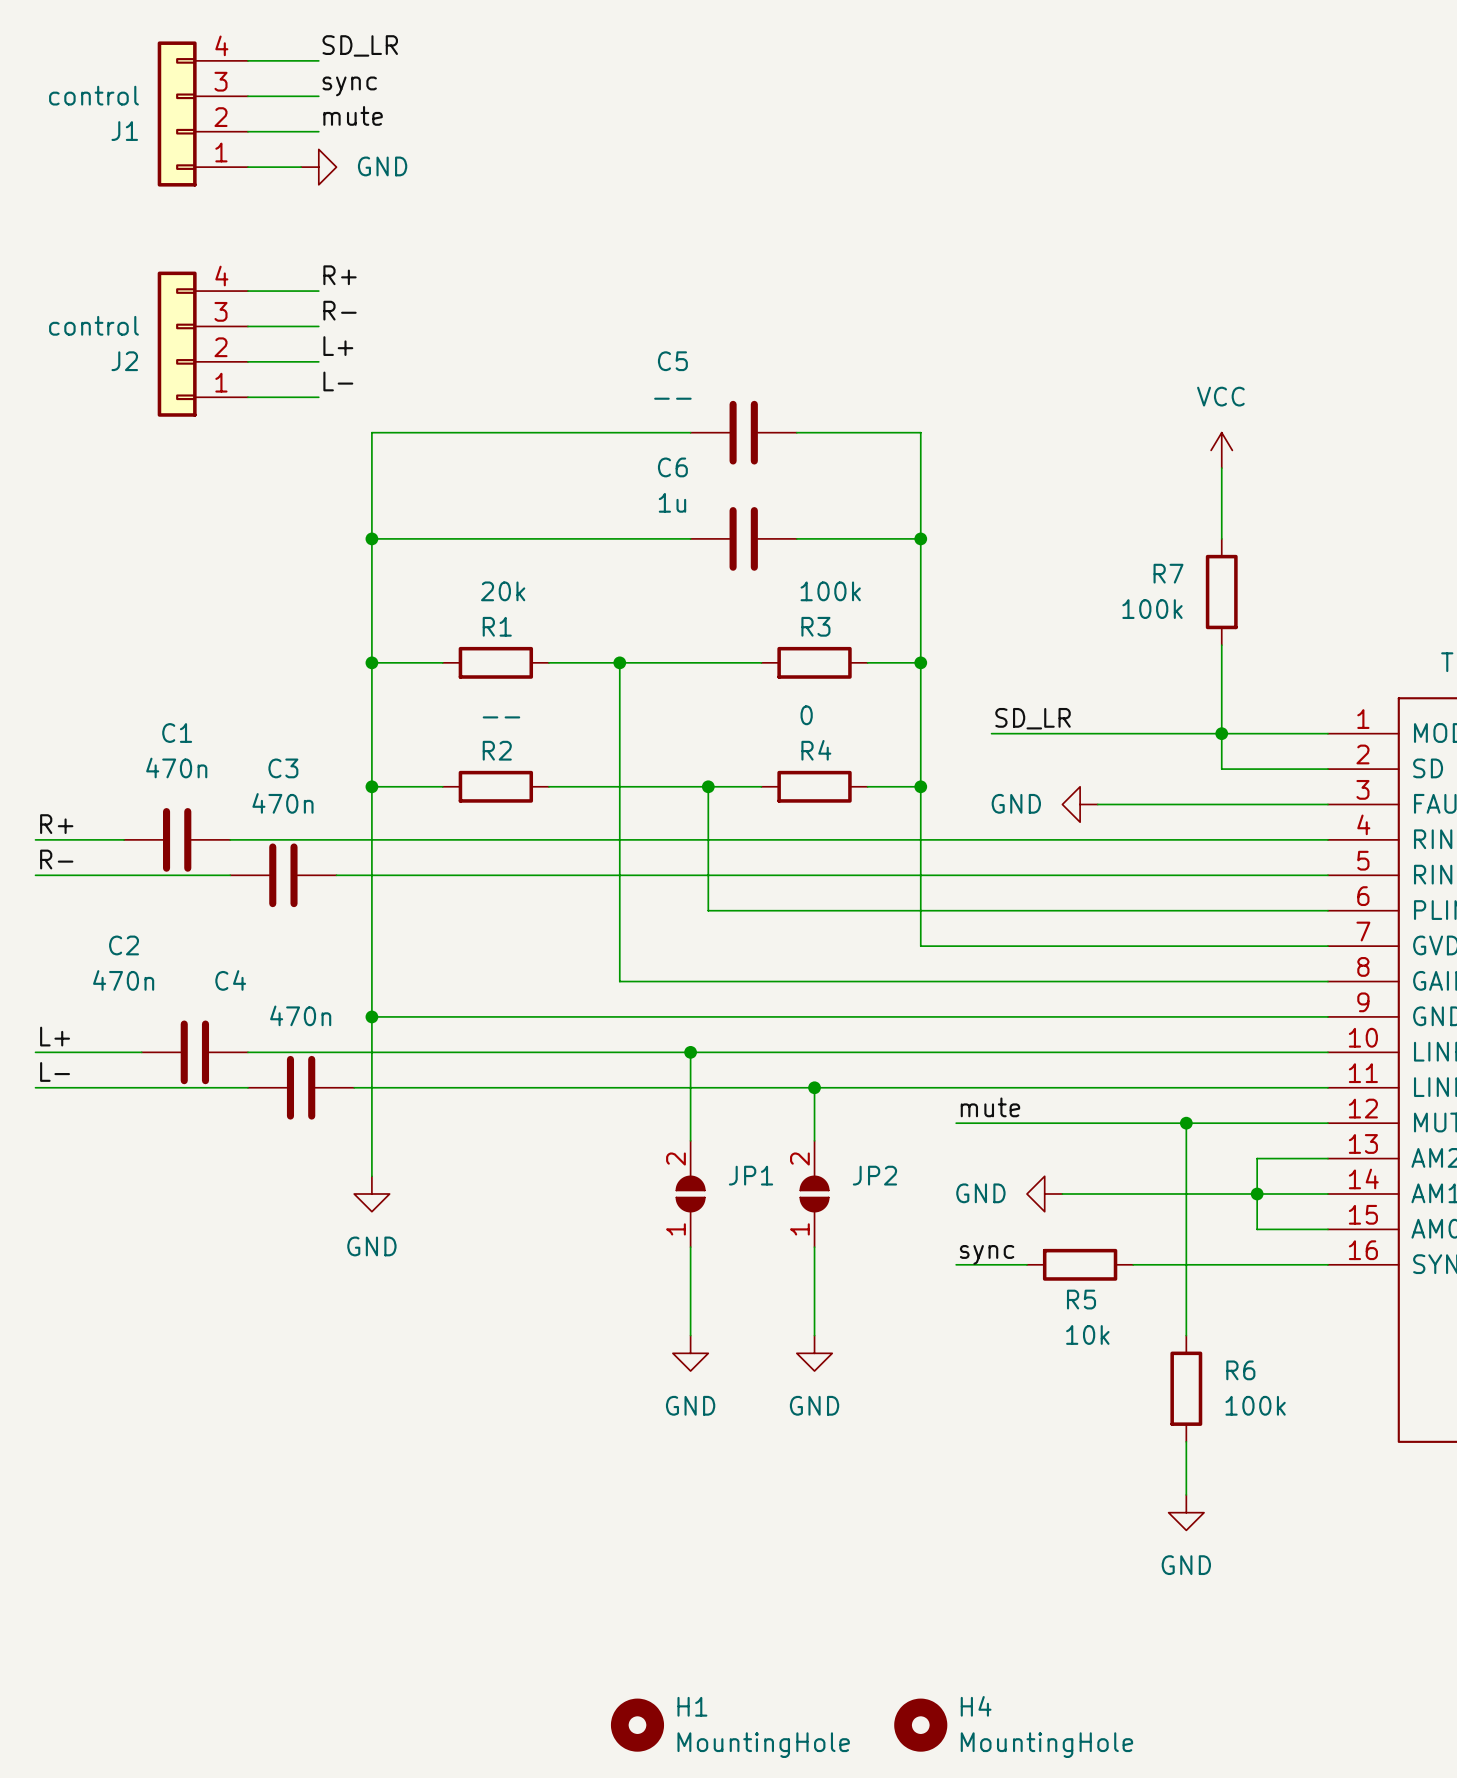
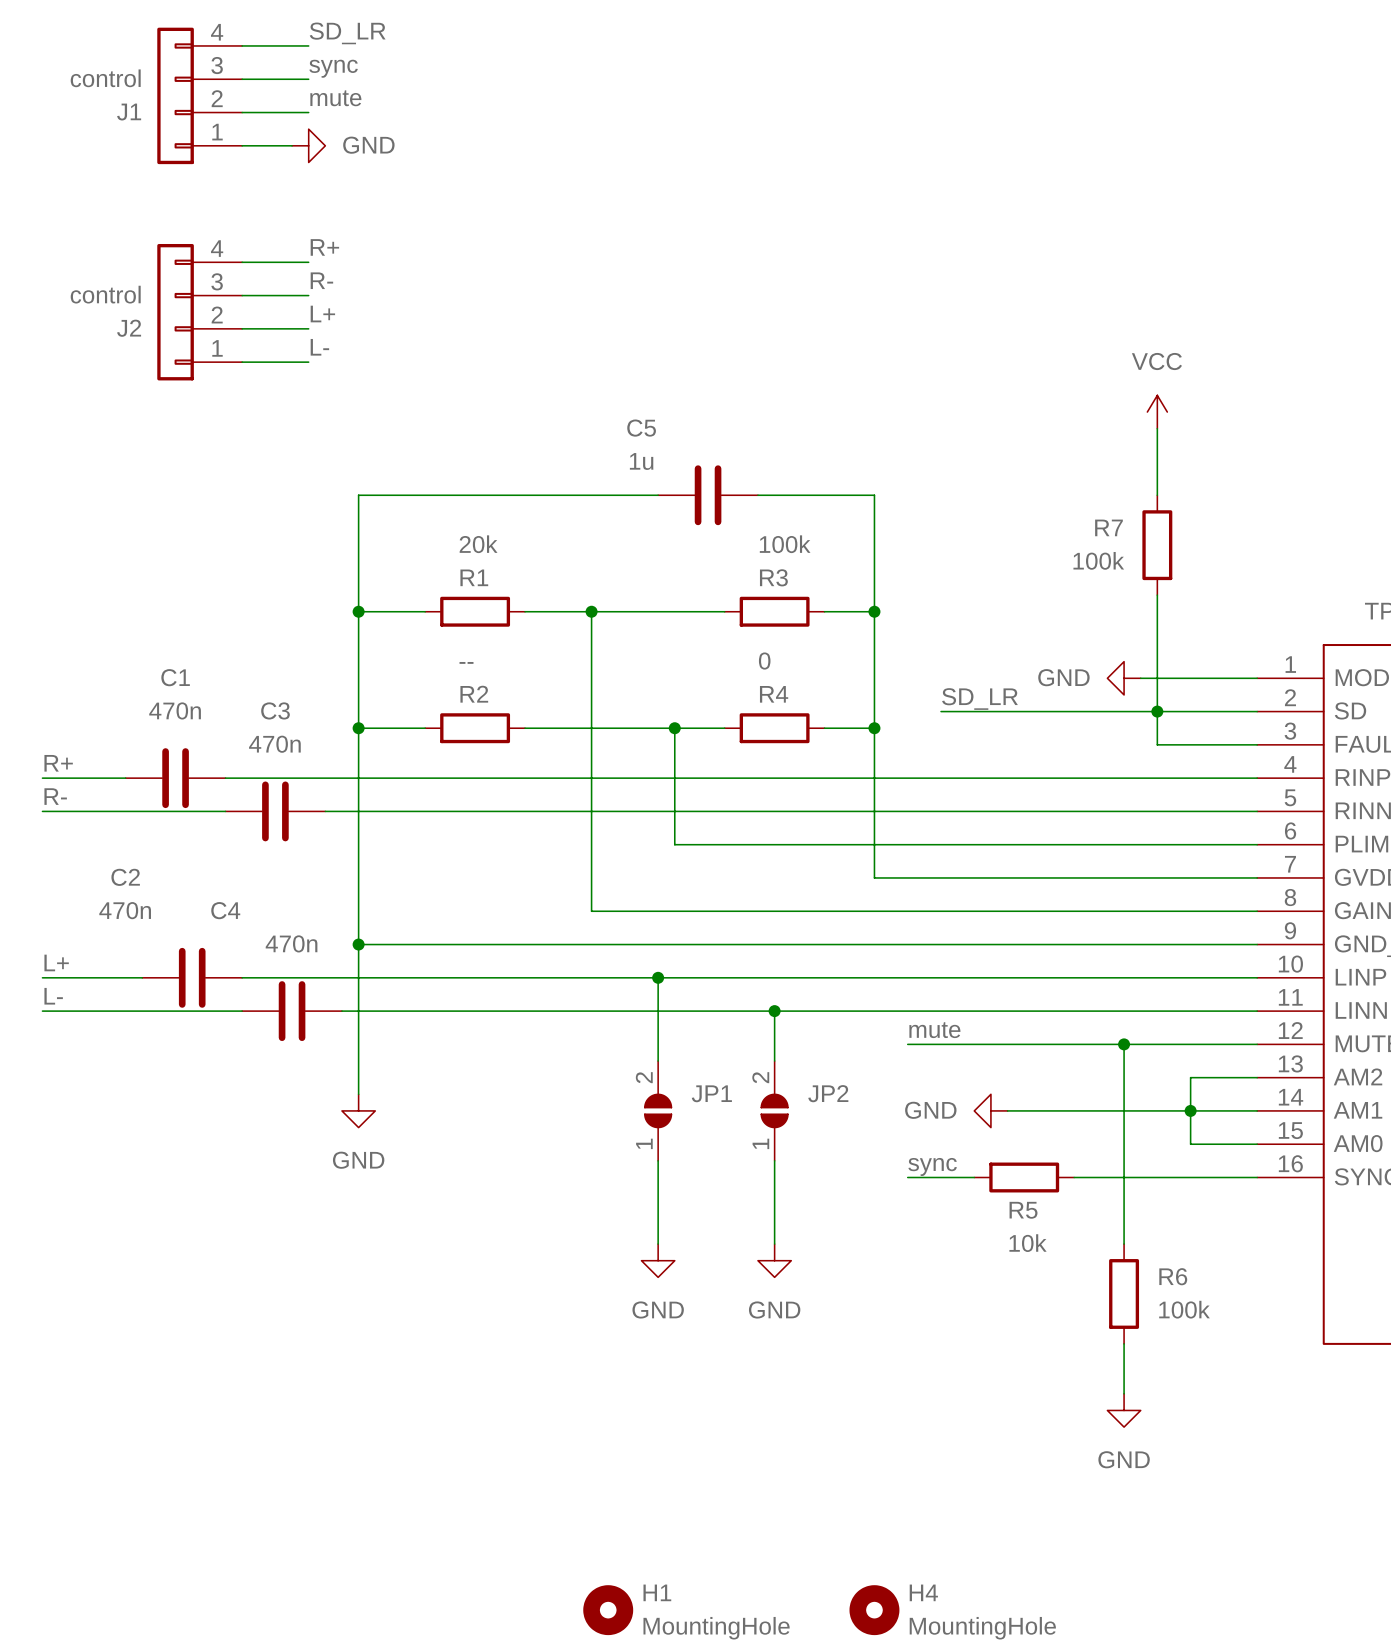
wire: (690, 432) (371, 432) (371, 538) -> none
C5: -- (743, 432) -> none
wire: (796, 432) (920, 432) (920, 538) -> none
C6 name: C6 (672, 467) -> C5 (641, 428)
junction: (371, 538) -> none
junction: (920, 538) -> none
label position: SD_LR (1033, 718) -> SD_LR (979, 699)
wire: (991, 733) (1204, 733) -> none
junction position: (1221, 733) -> (1157, 711)
power symbol position: GND (1080, 804) -> GND (1124, 678)
wire: (1097, 804) (1221, 804) -> (941, 711) (1157, 711) (1157, 744)

